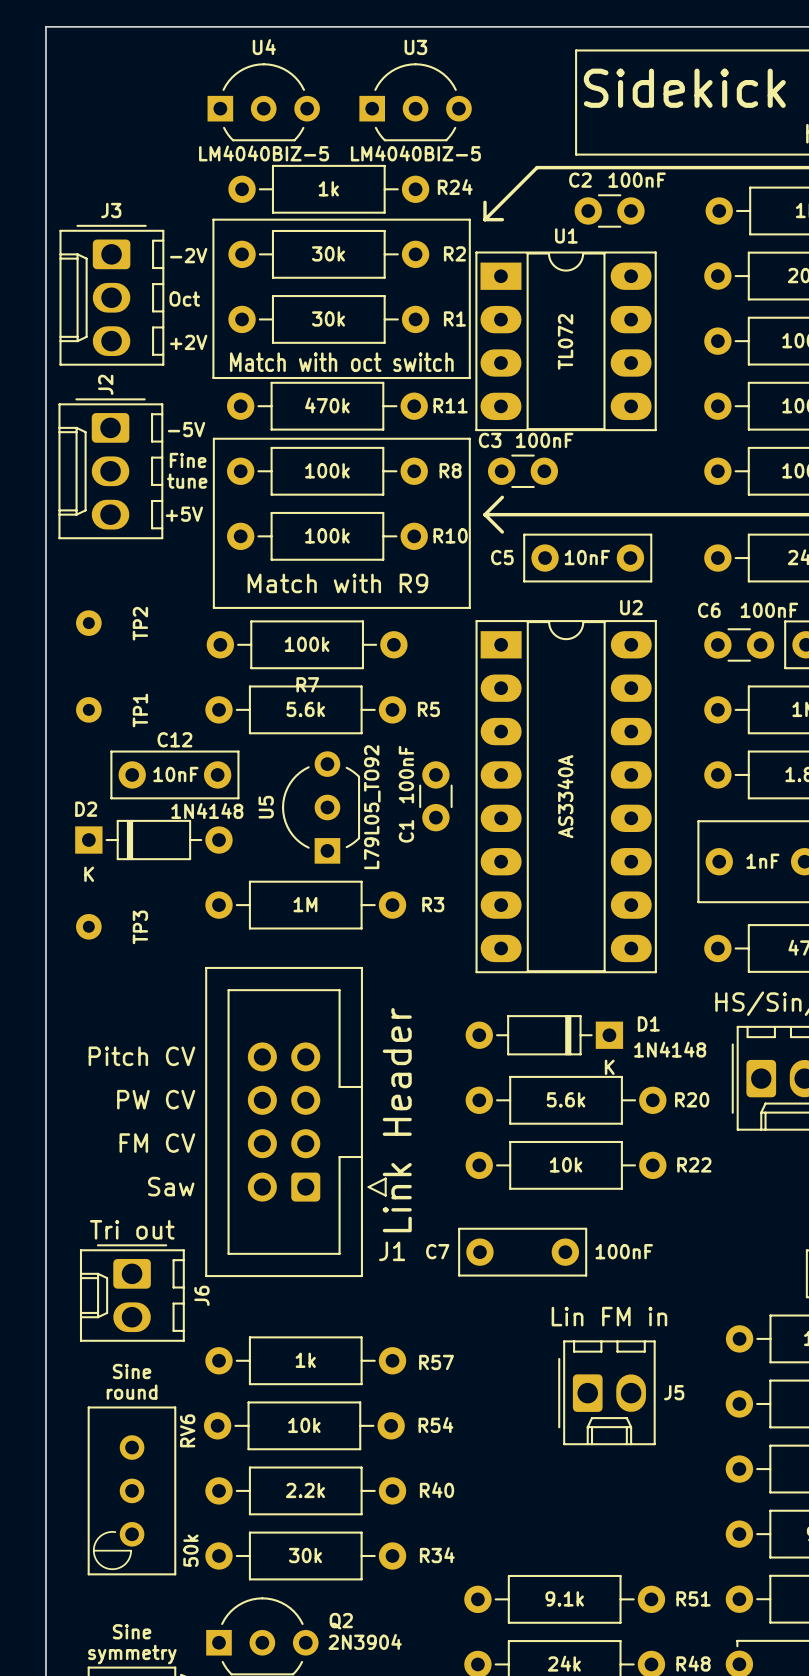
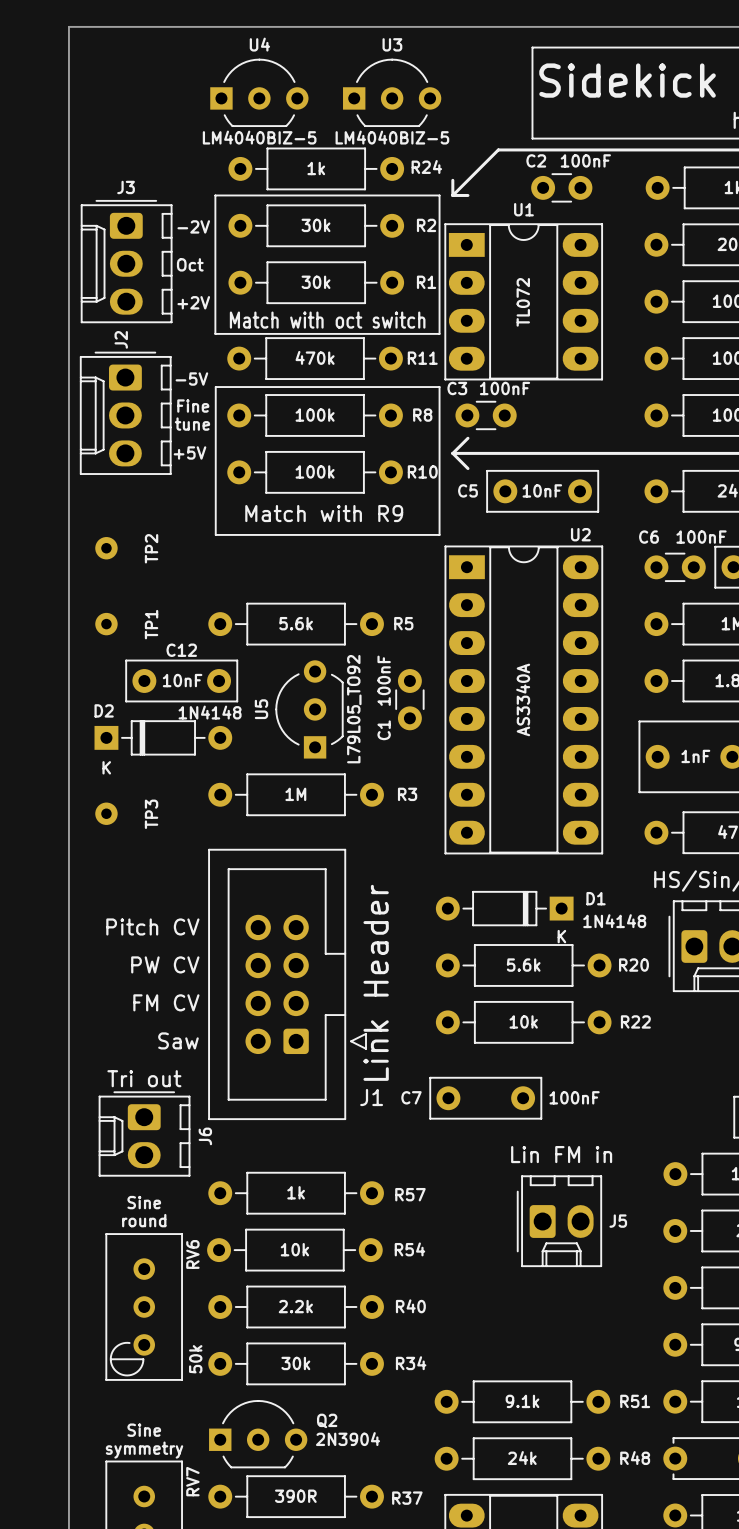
R7: 100k (307, 644) -> none

